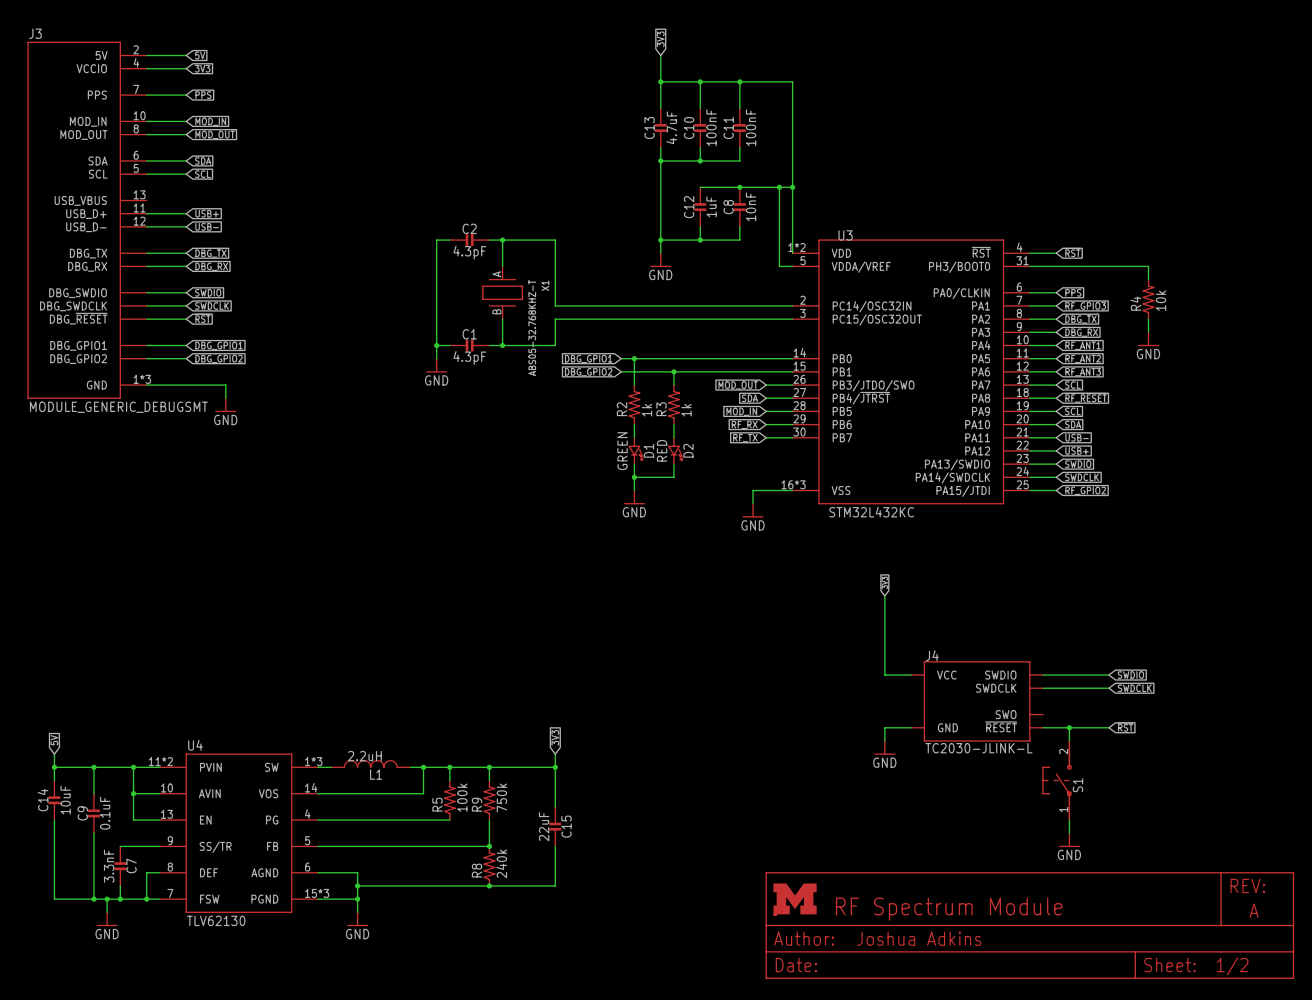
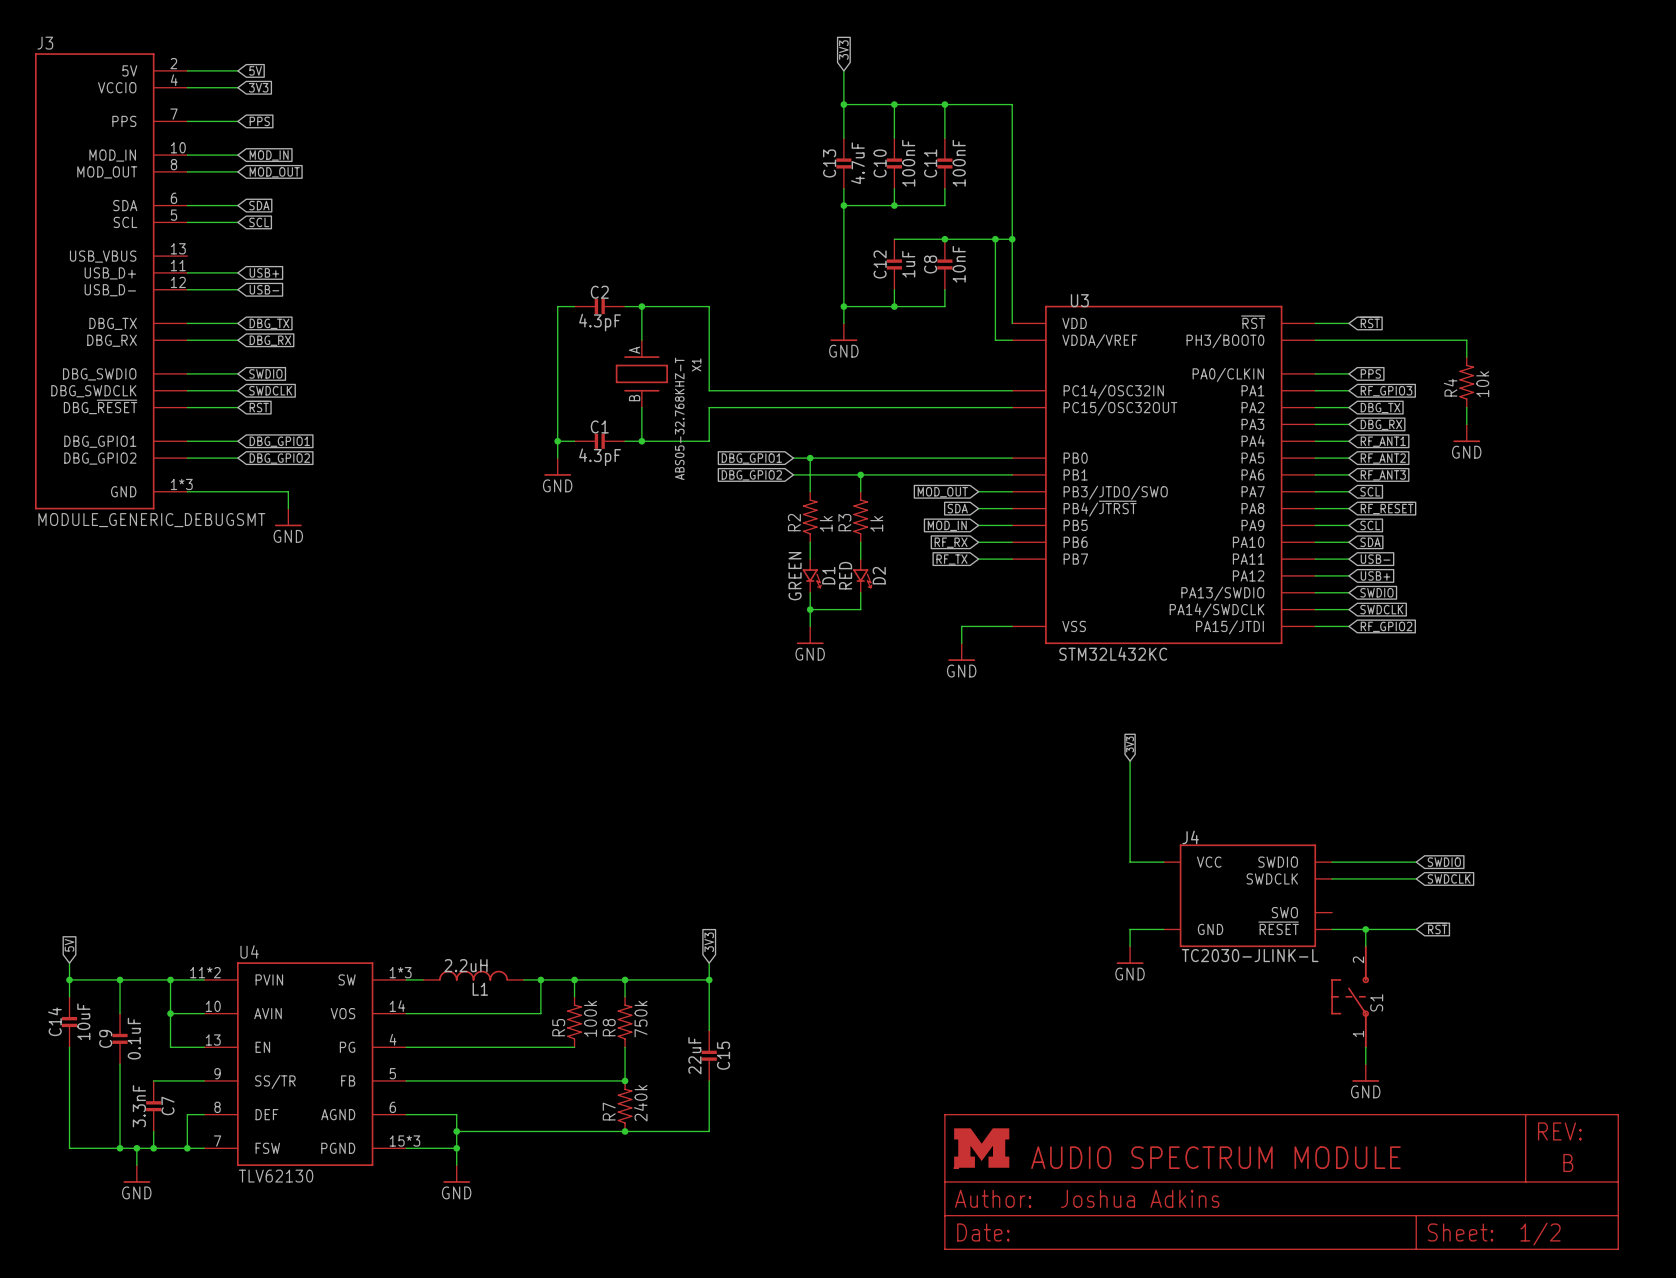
U3 symbol: [792, 239, 1030, 505] -> [1012, 305, 1316, 645]
R9 name: R9 (477, 804) -> R8 (609, 1027)
R8 name: R8 (477, 870) -> R7 (609, 1111)
part: none -> (1281, 1181)
part: (1029, 925) -> none

